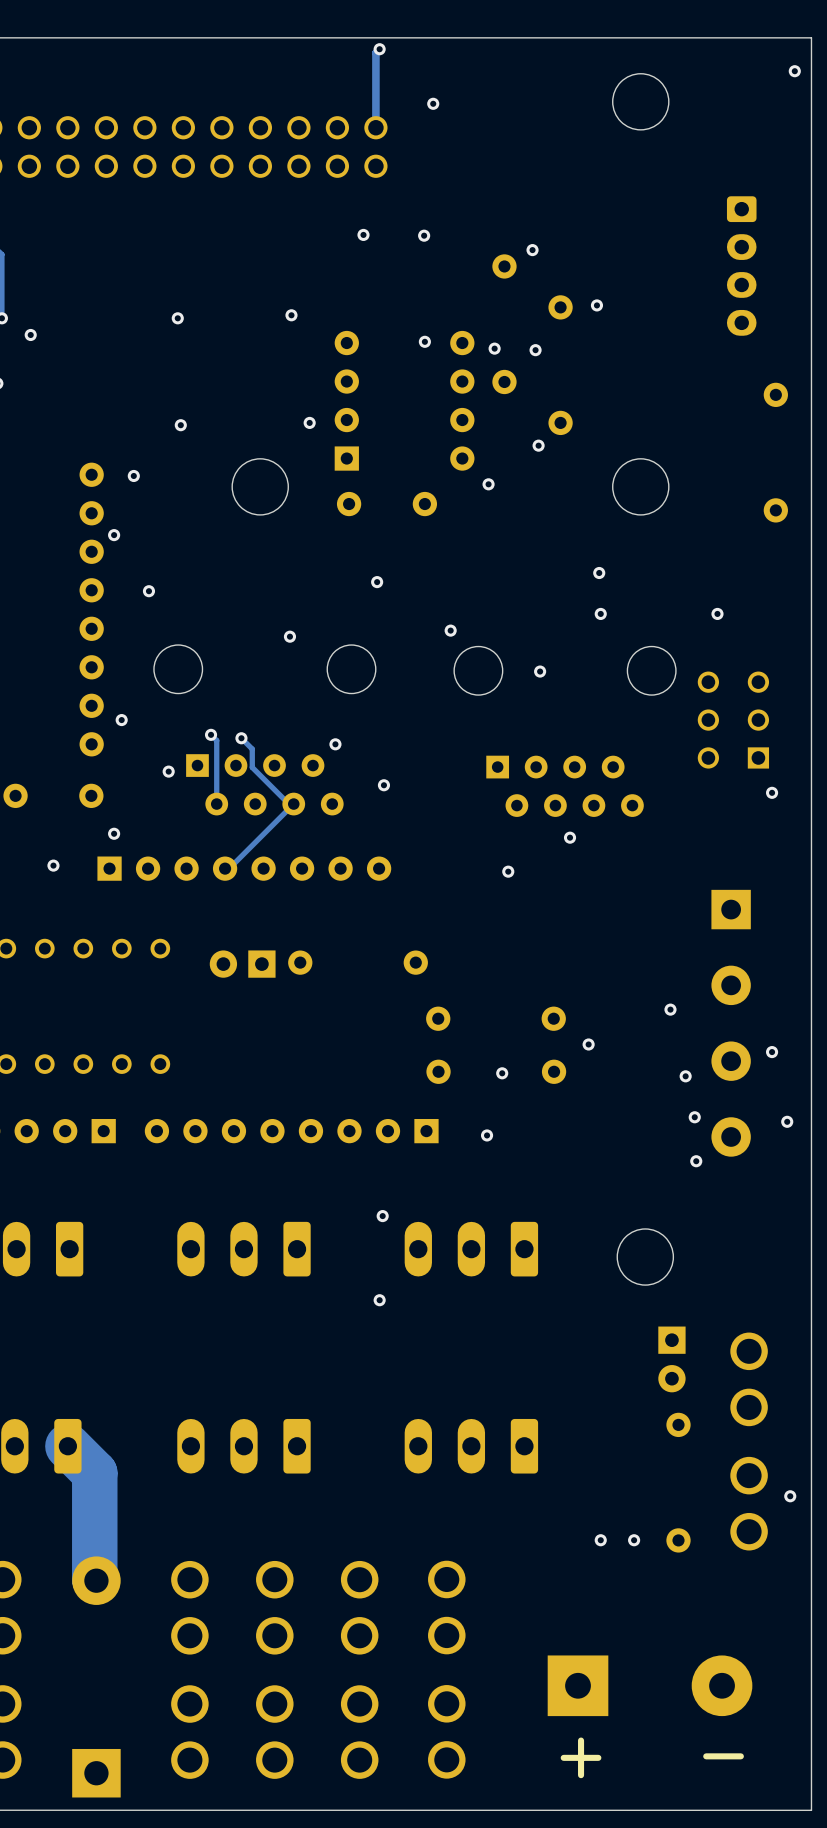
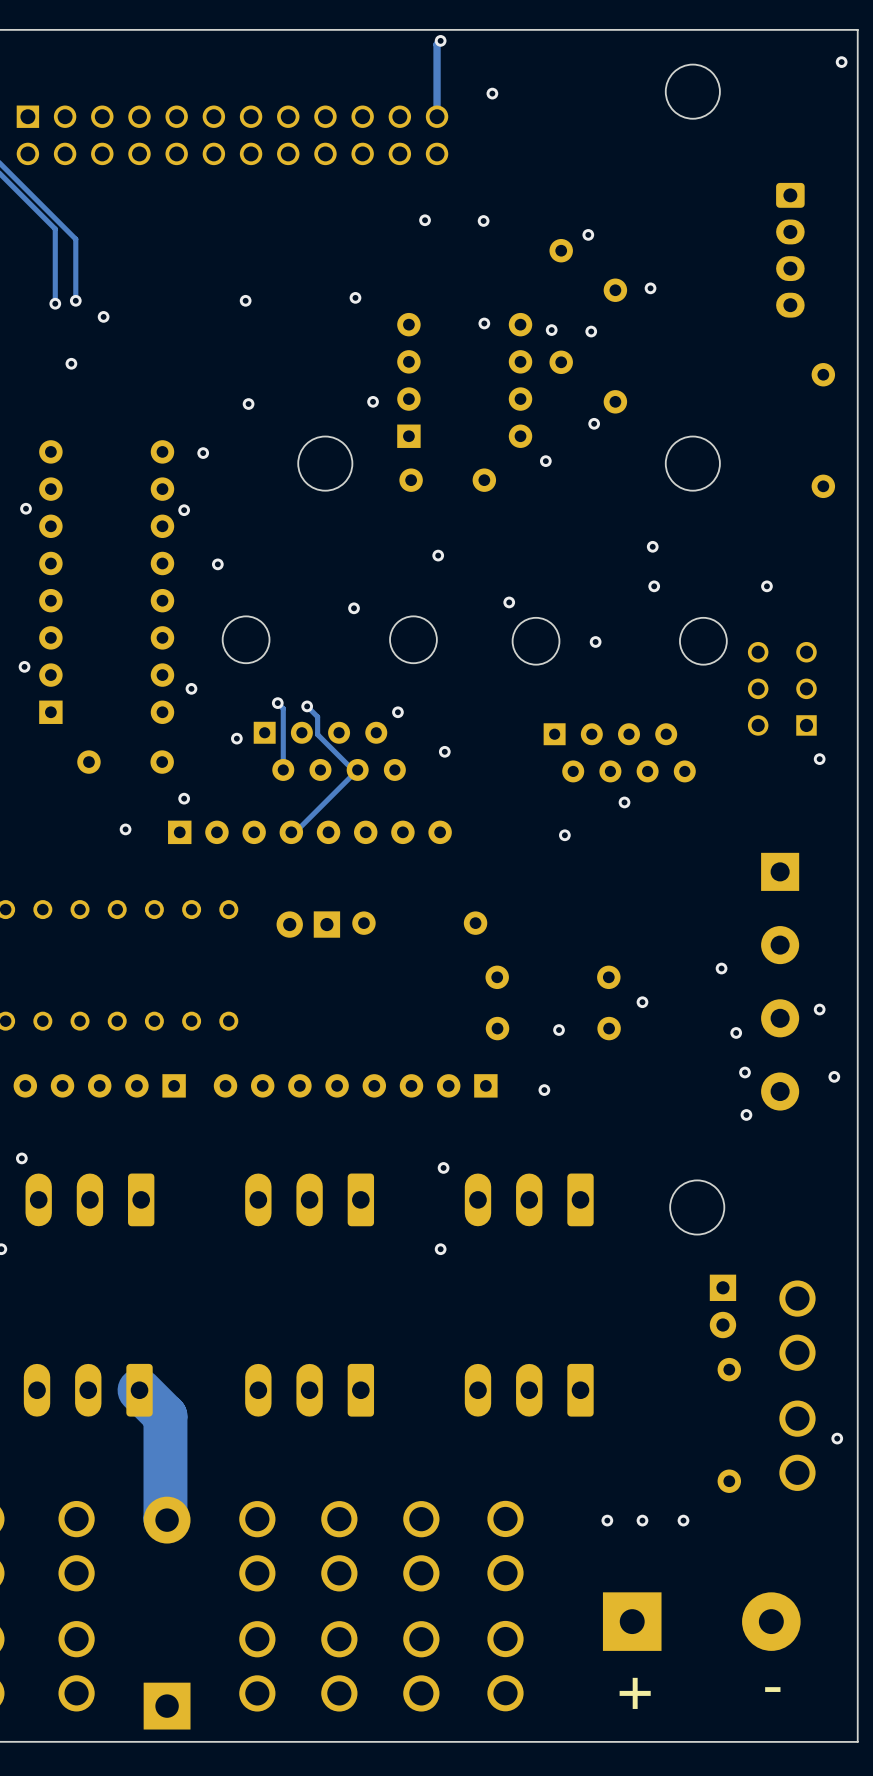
via: (600, 1540) -> none
via: (634, 1540) -> none
via: none -> (607, 1520)
via: none -> (642, 1520)
via: none -> (683, 1520)

